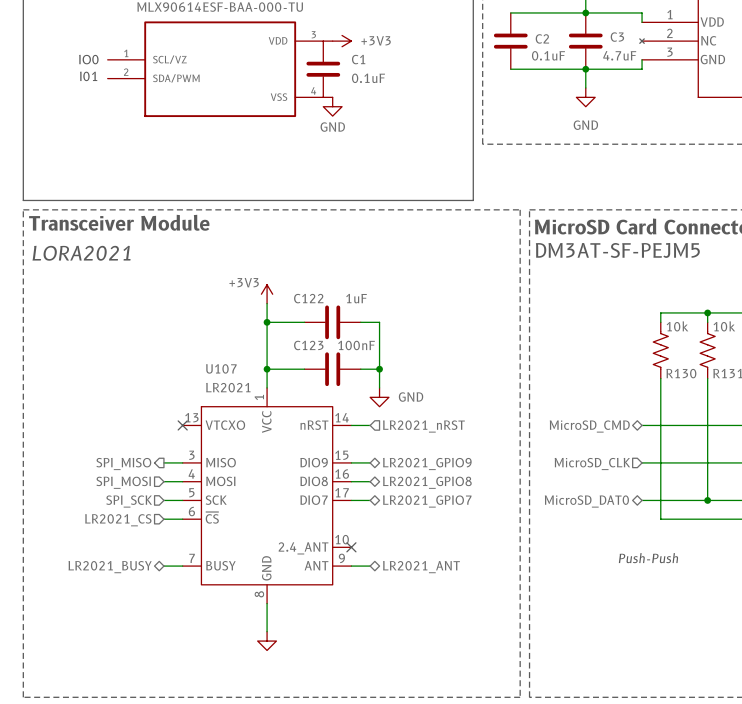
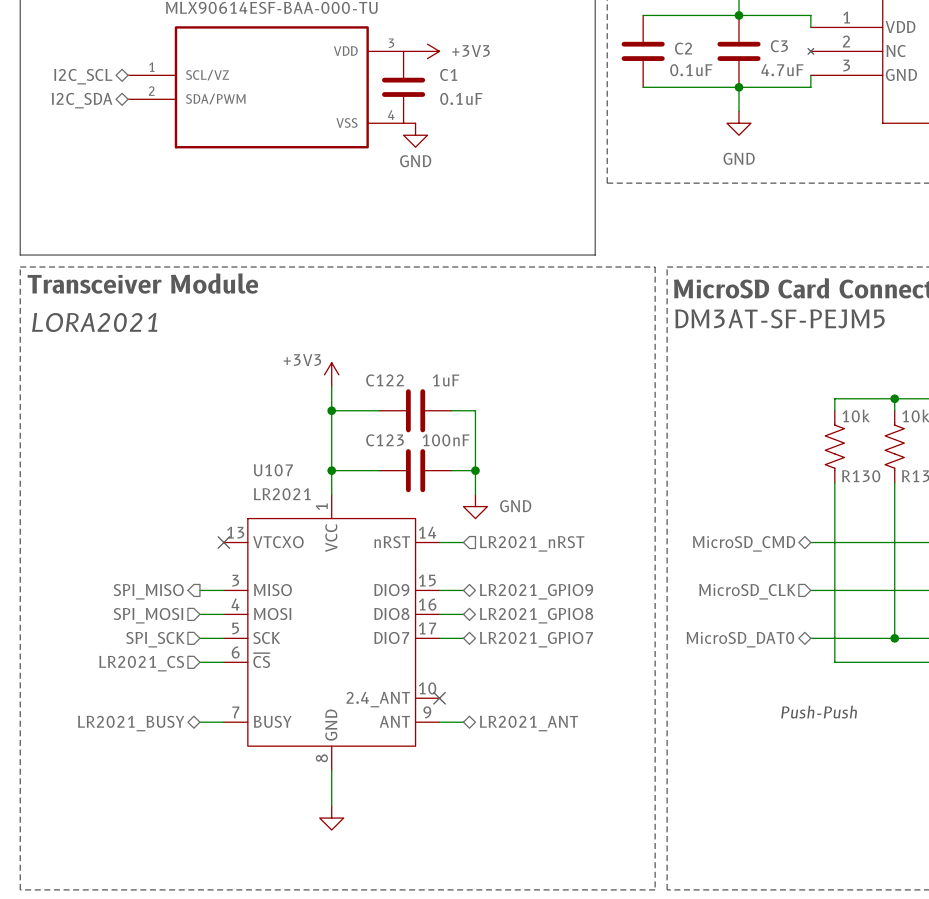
text: IO0 (88, 59) -> none
hierarchical label: none -> I2C_SCL (83, 76)
text: I01 (88, 76) -> none
hierarchical label: none -> I2C_SDA (82, 100)

